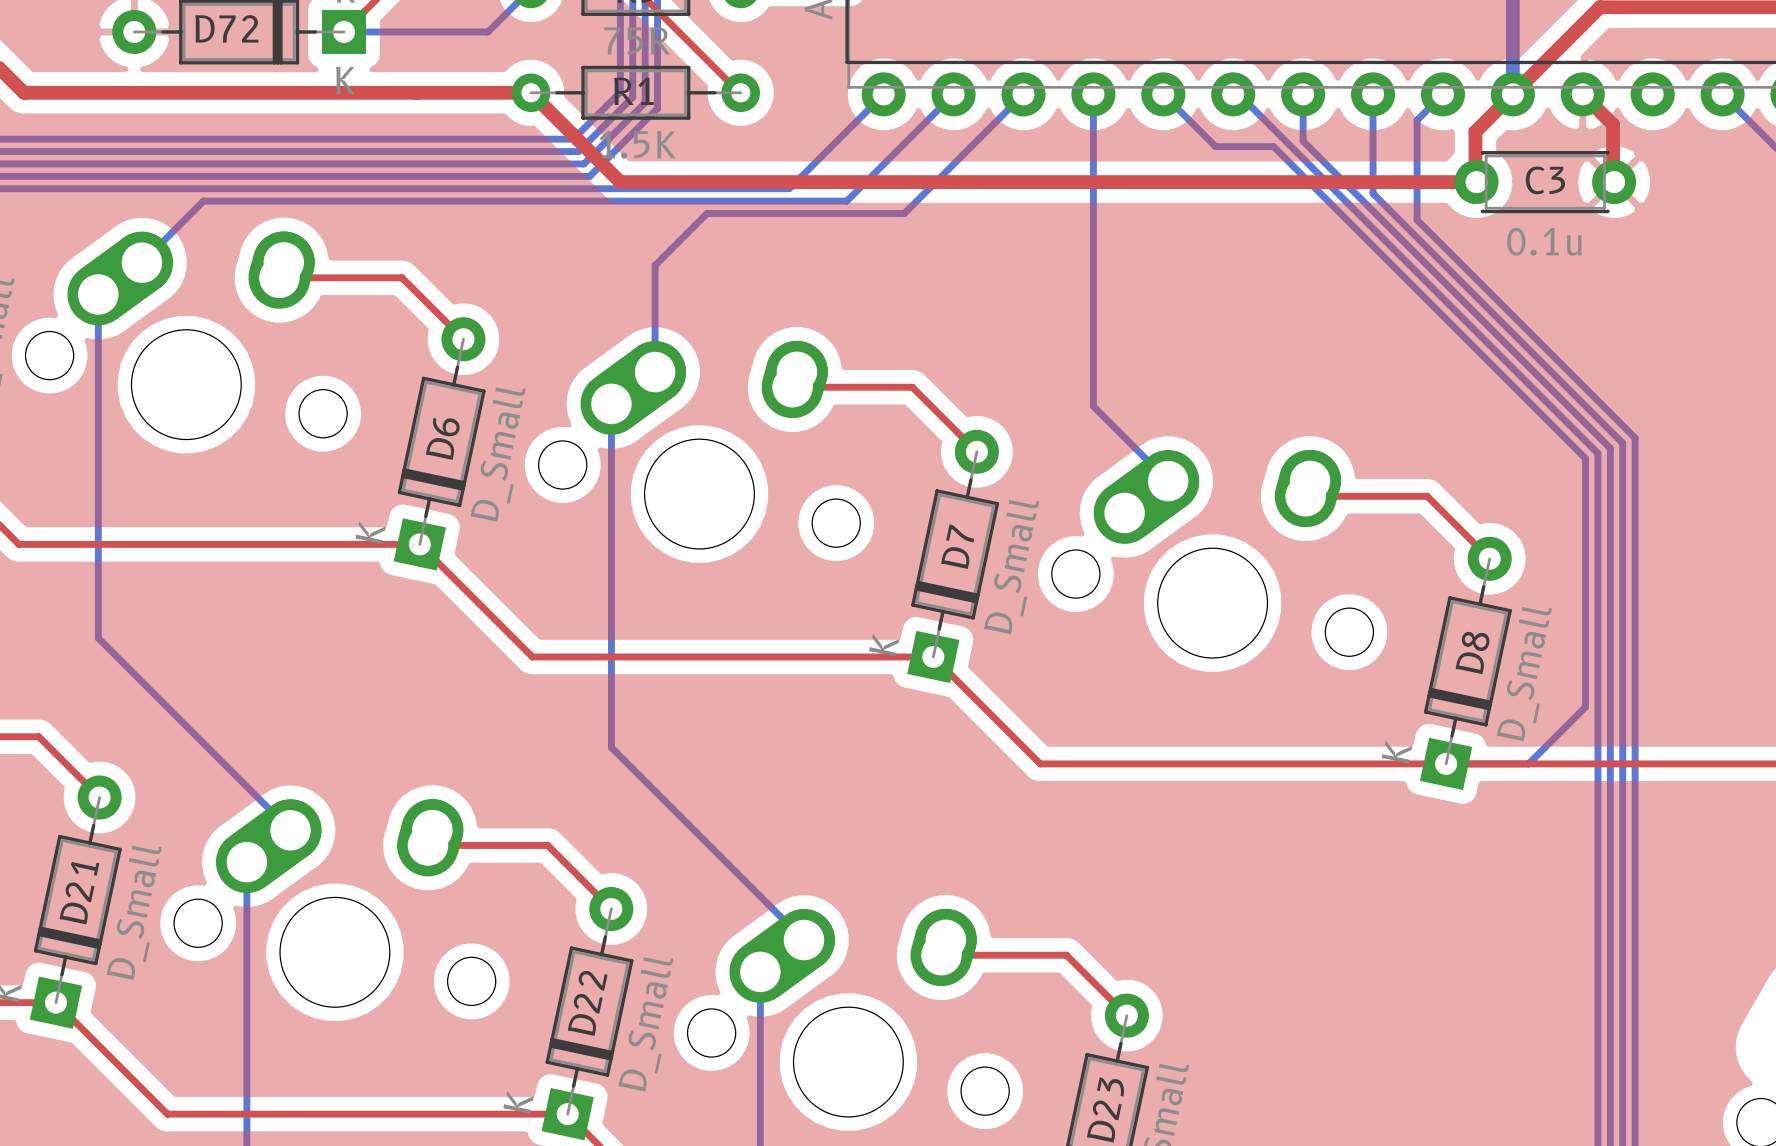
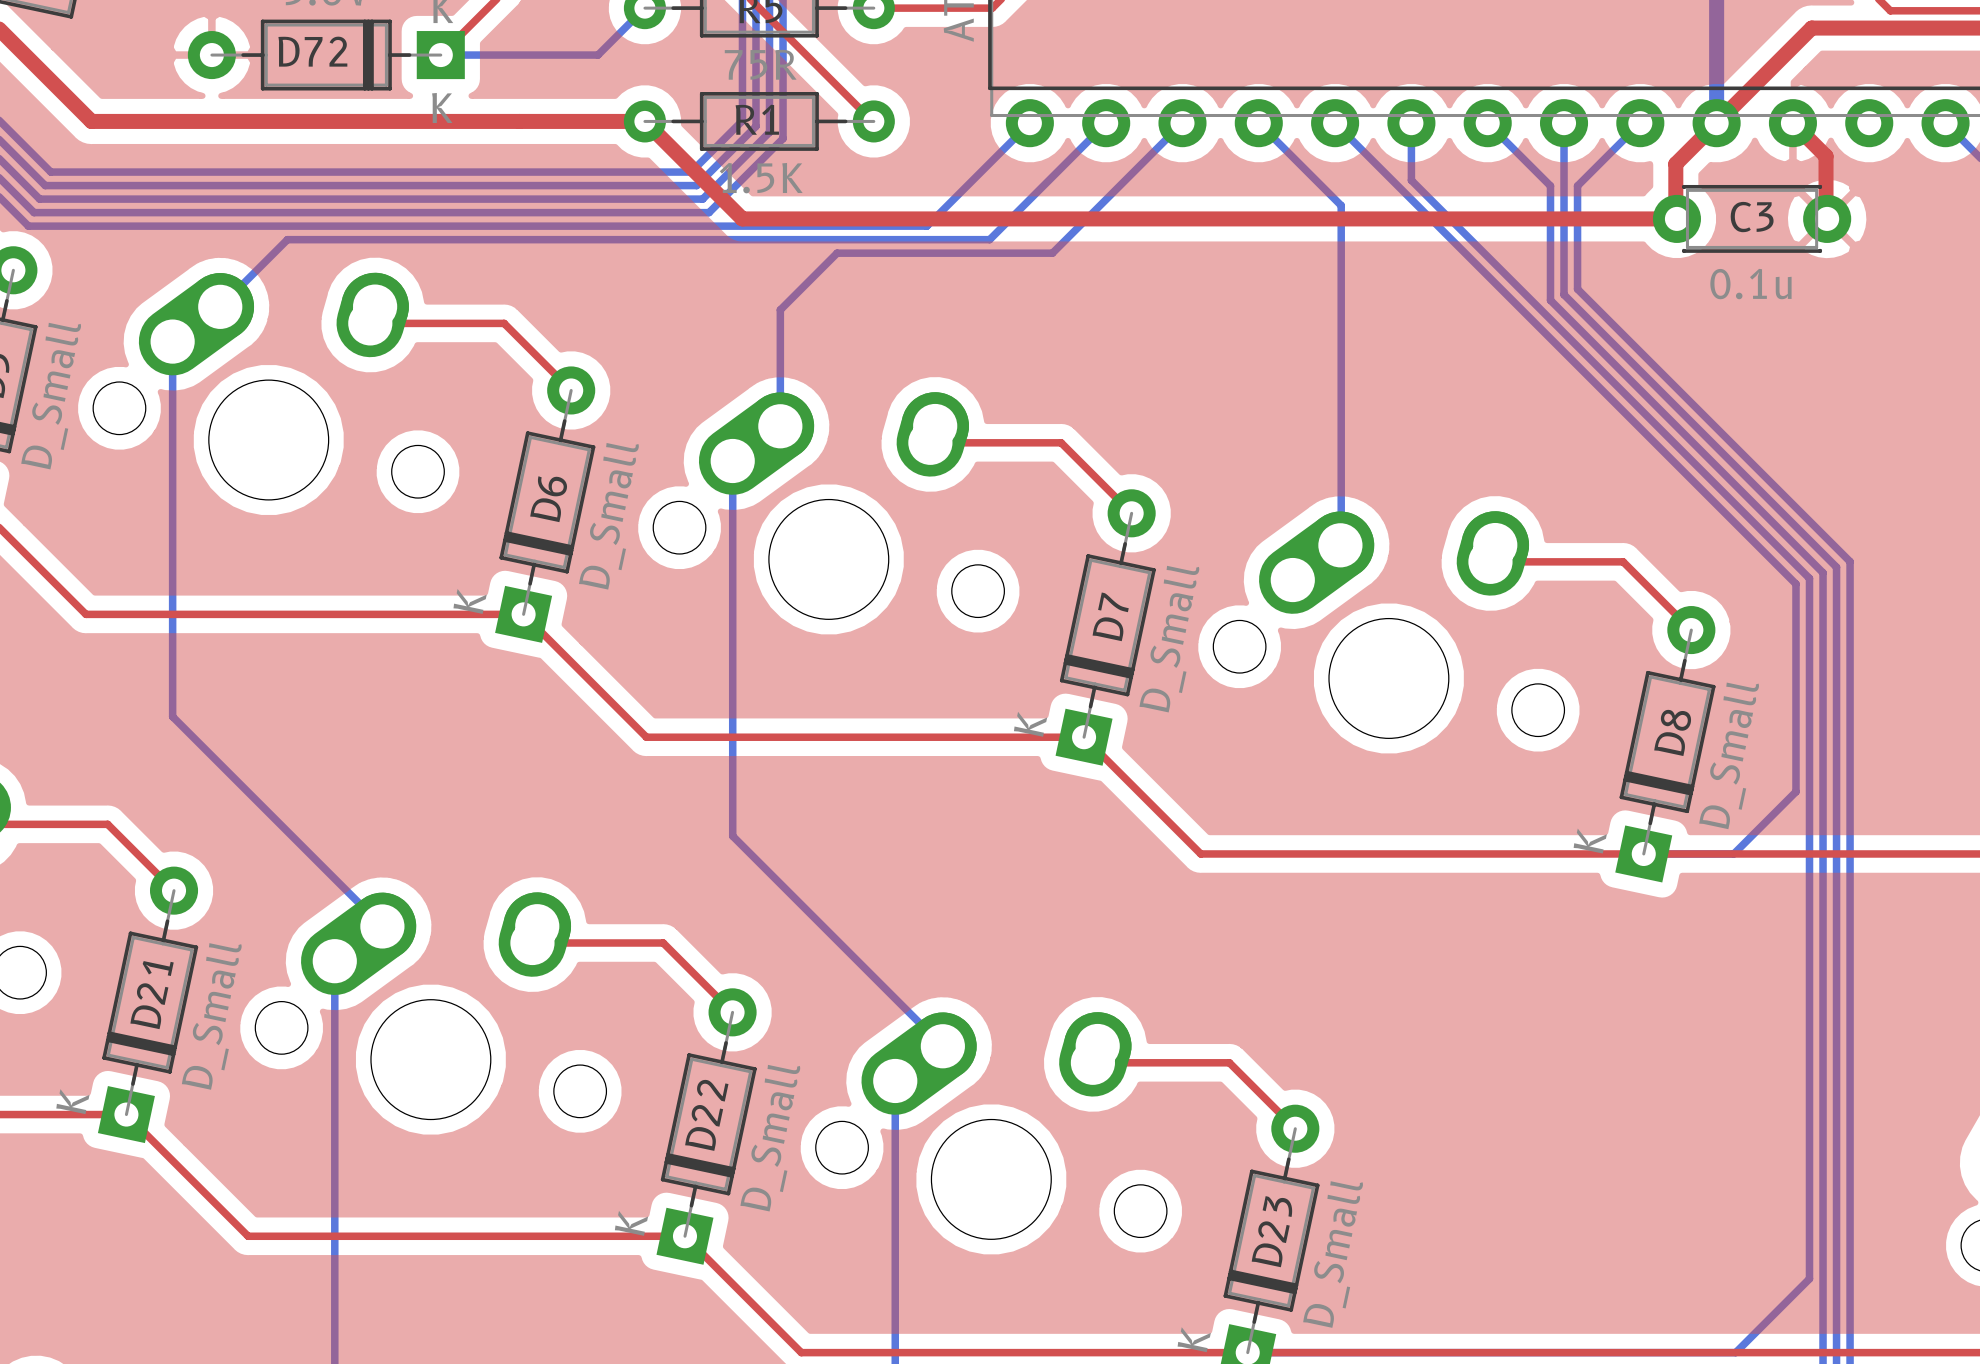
bottom track: (1093, 94) (1093, 406) (1168, 481) -> (1258, 123) (1341, 205) (1340, 545)
bottom track: (1238, 94) (1597, 453) (1597, 511) -> (1411, 123) (1411, 180) (1809, 578)
bottom track: (1303, 94) (1303, 141) (1610, 448) (1610, 506) -> (1487, 123) (1550, 185) (1550, 300) (1823, 572)
bottom track: (1417, 120) (1417, 220) (1635, 438) (1635, 496) -> (1612, 151) (1577, 185) (1577, 289) (1850, 561)
bottom track: (1215, 146) (1273, 146) (1585, 458) (1585, 516) -> (1392, 180) (1795, 584)
bottom track: (1373, 193) (1622, 443) (1622, 501) -> (1564, 231) (1564, 294) (1836, 567)

